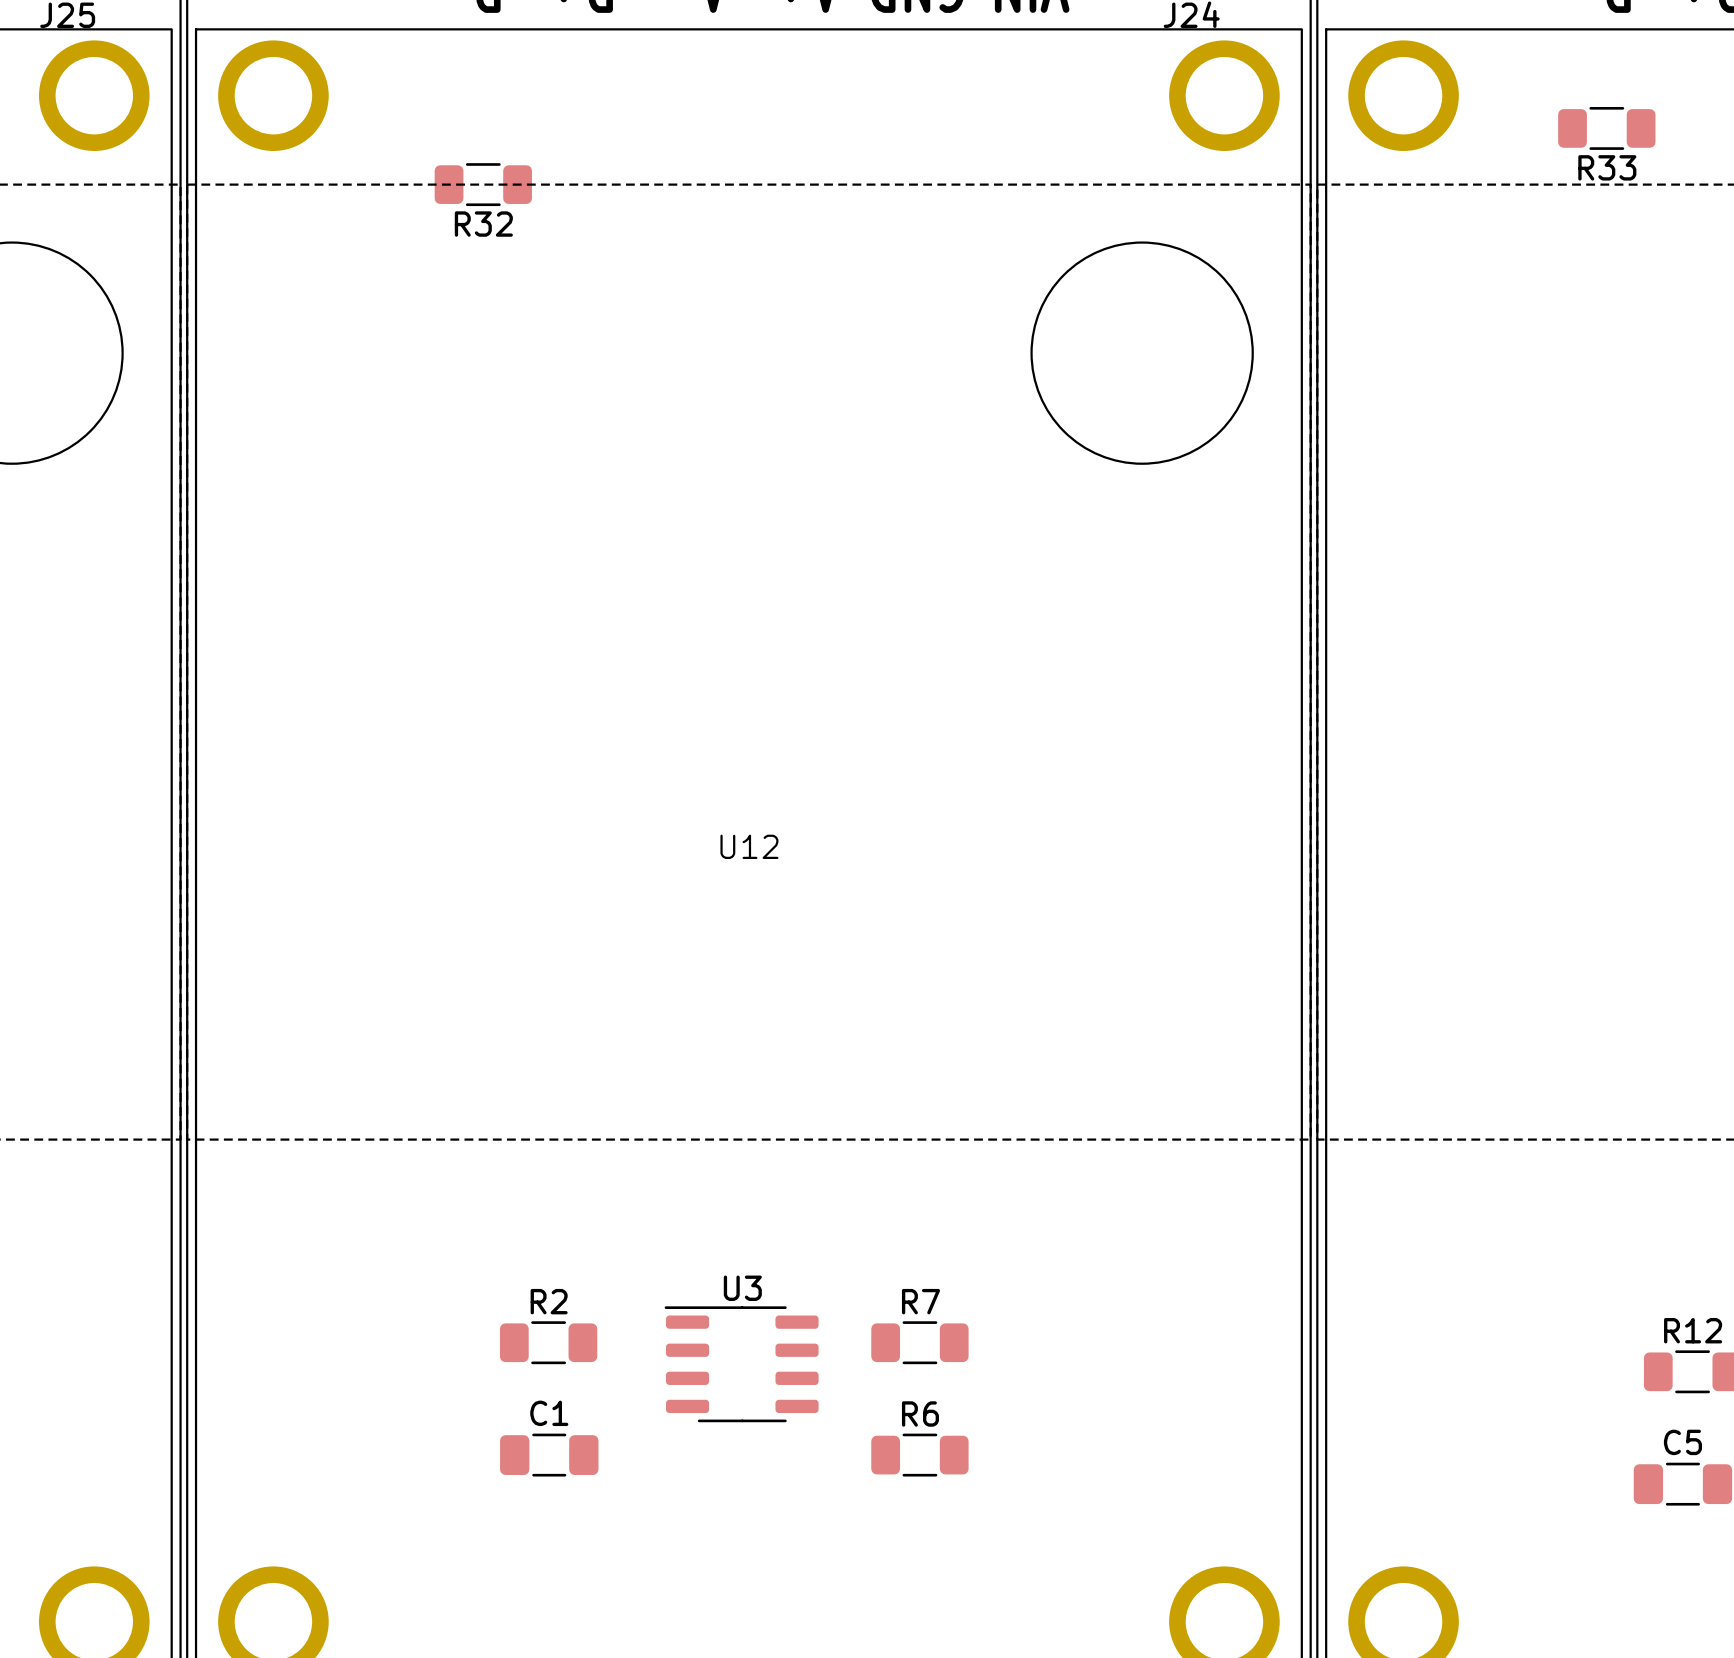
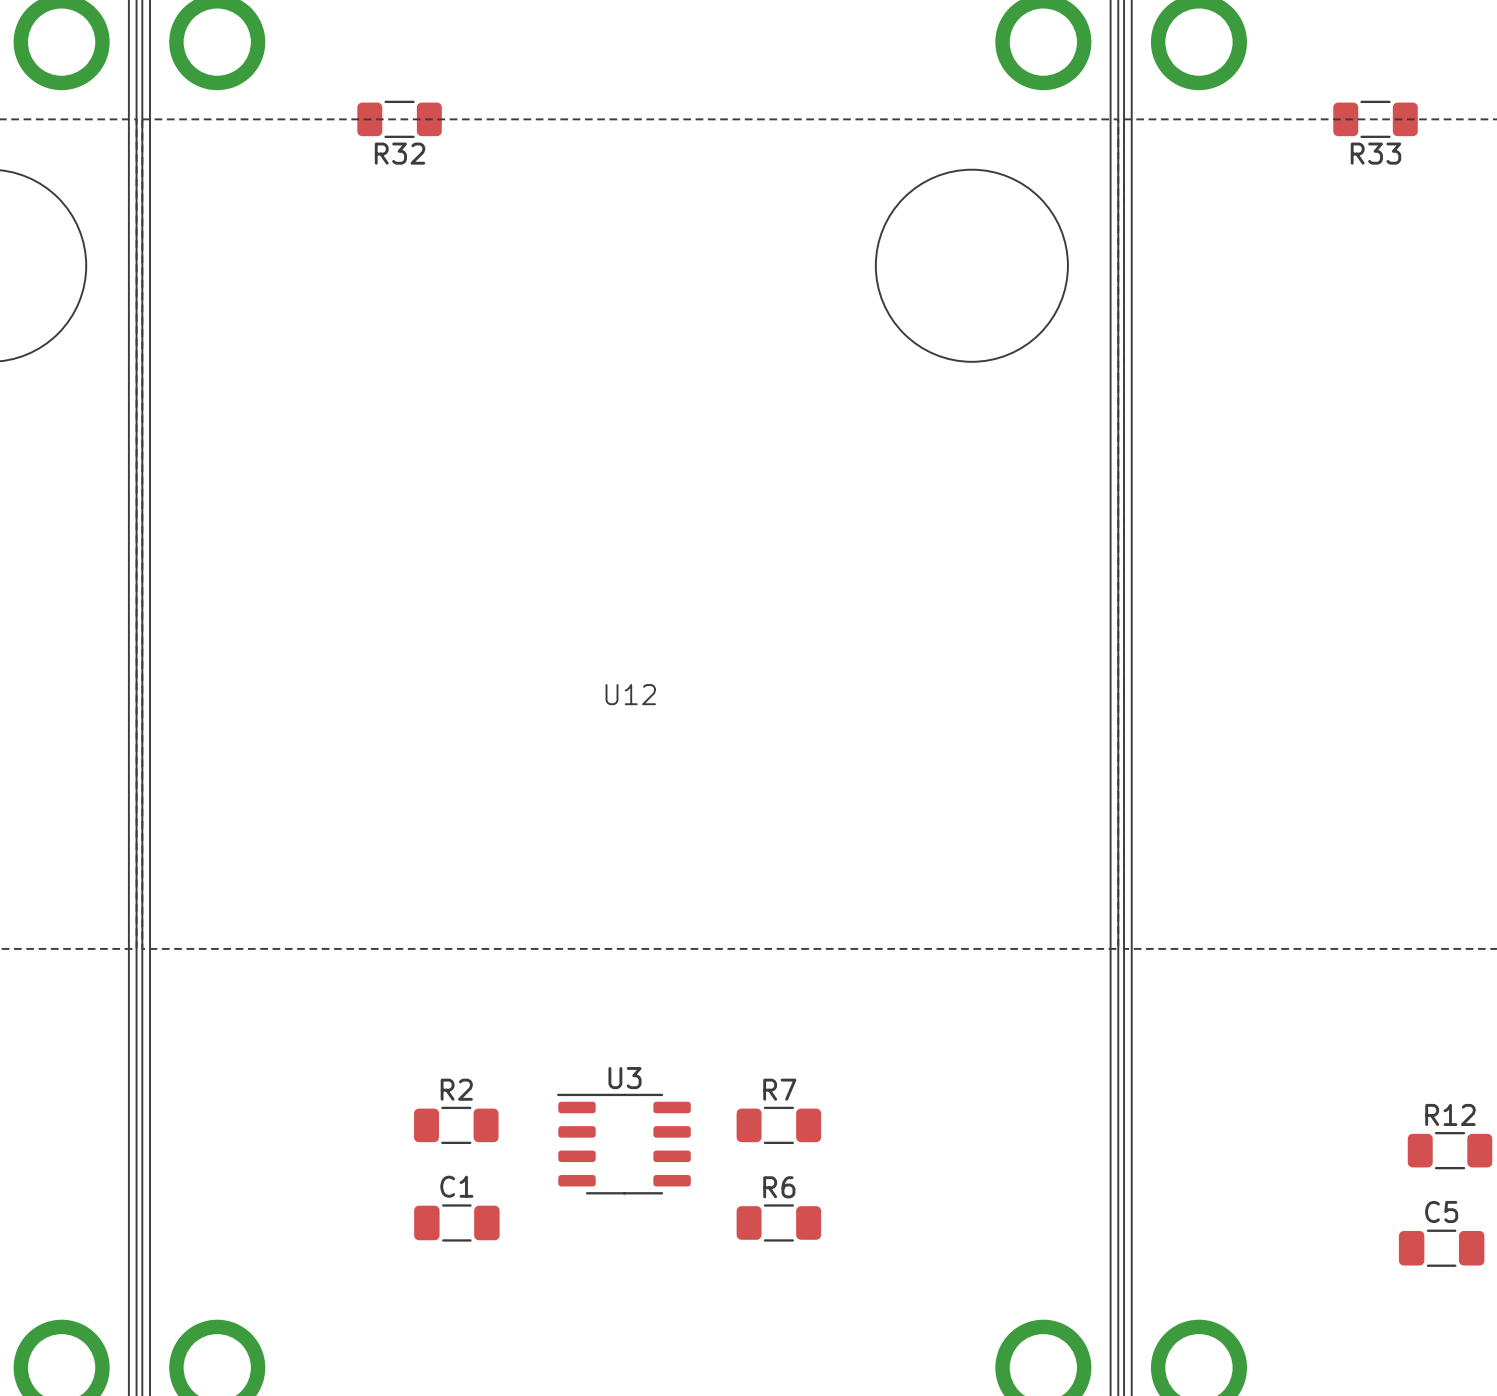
R33 position: (1606, 128) -> (1375, 119)

